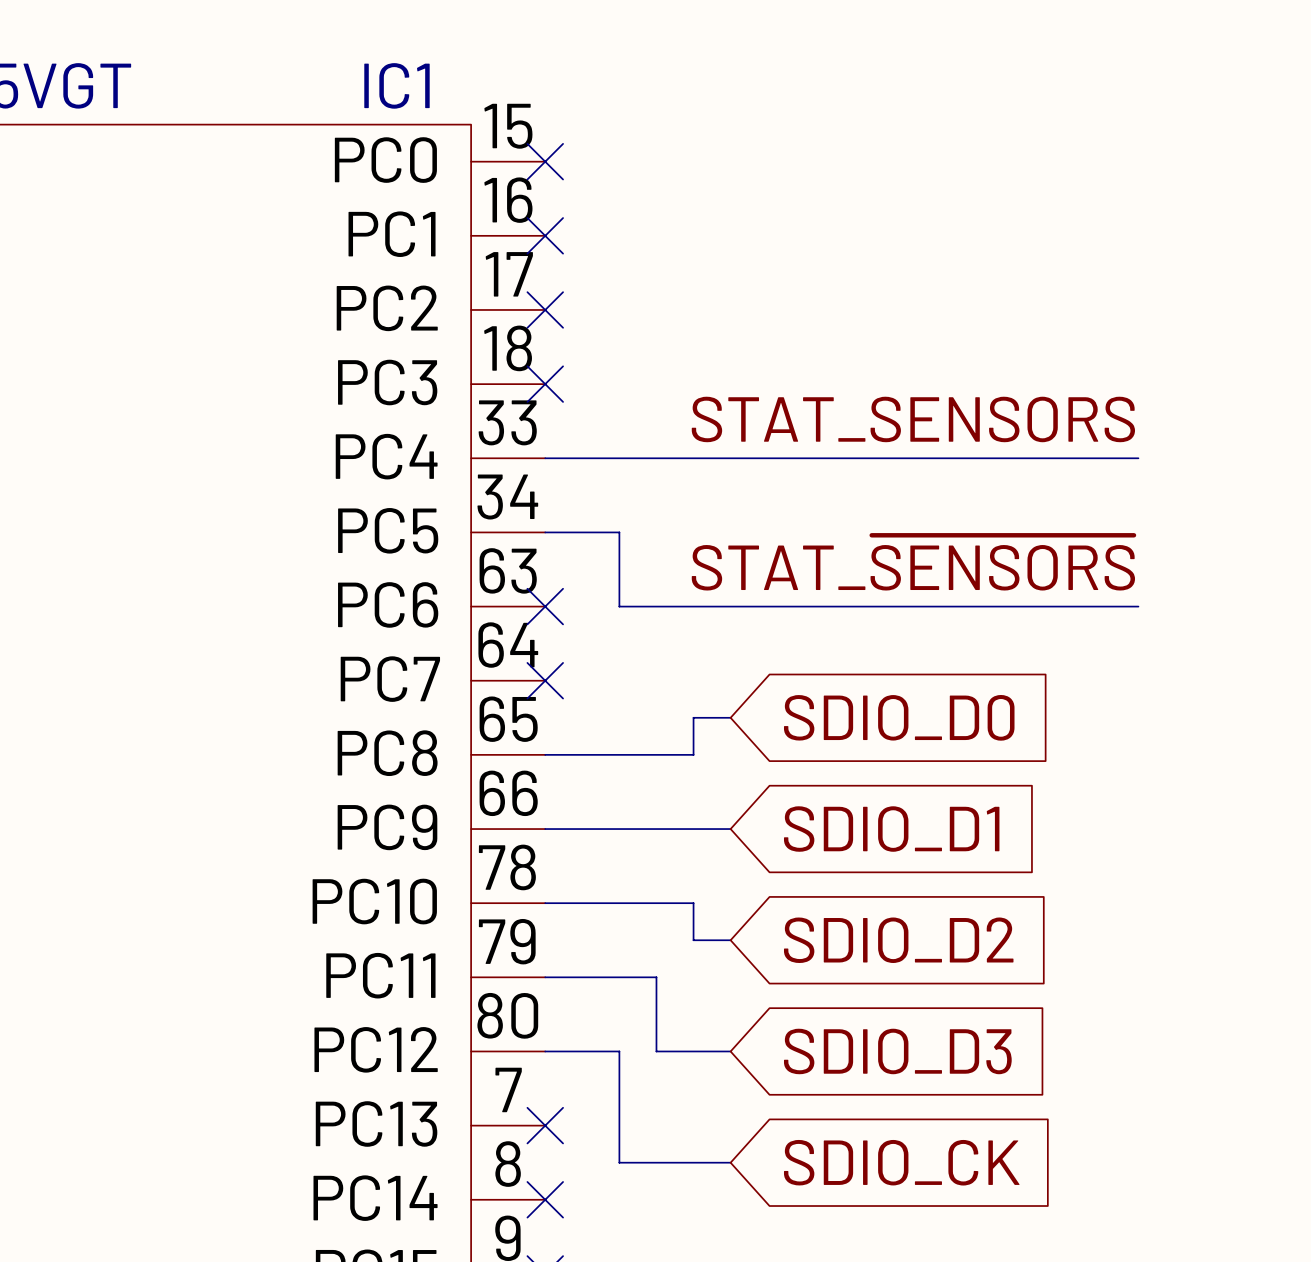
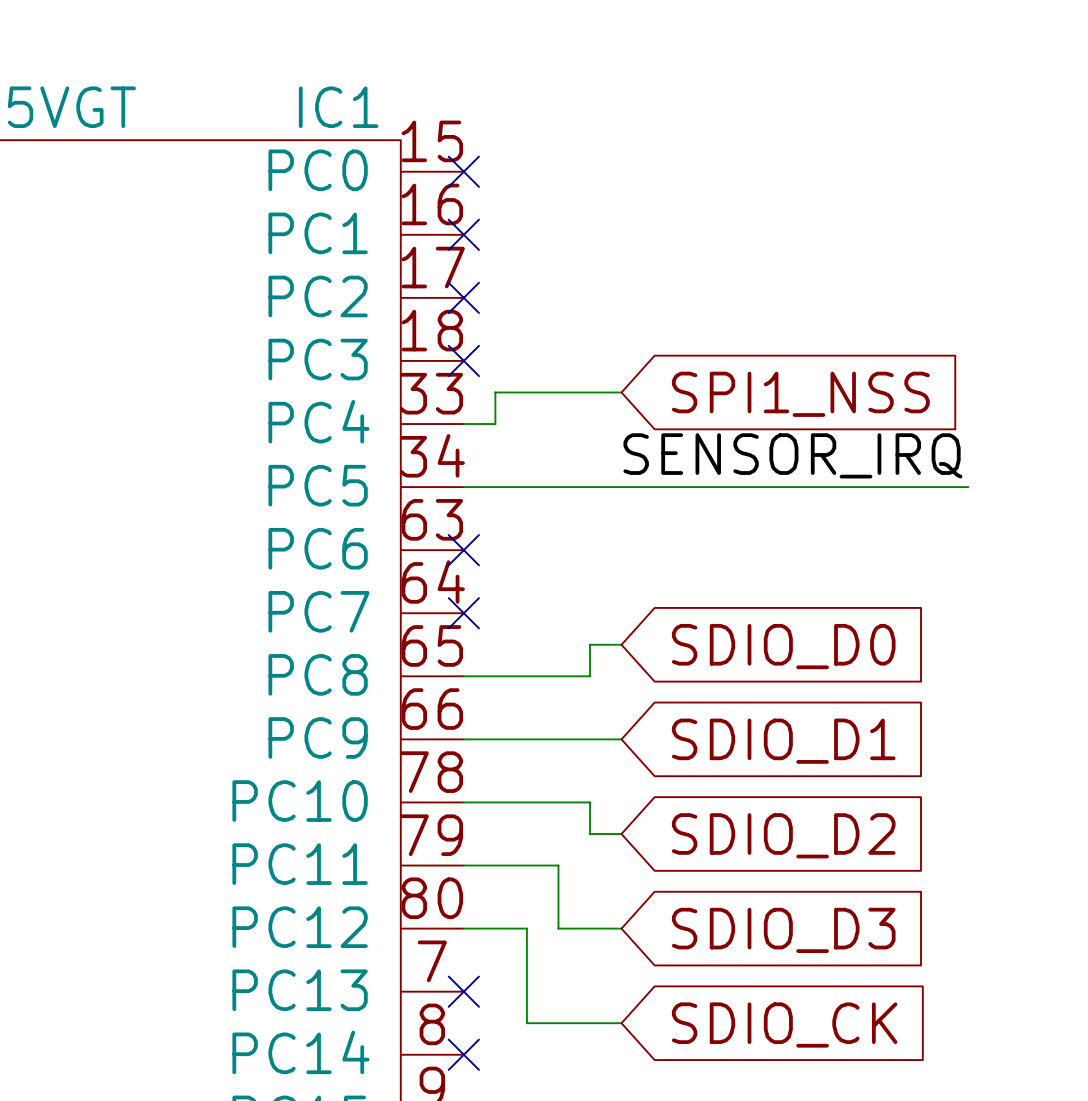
label: STAT_SENSORS (913, 419) -> none
global label: none -> SPI1_NSS (800, 394)
wire: (582, 458) (1138, 458) -> (495, 424) (495, 392) (621, 392)
label: none -> SENSOR_IRQ (792, 455)
wire: (619, 532) (619, 606) (1138, 606) -> (526, 487) (968, 487)
label: STAT_~{SENSORS} (913, 562) -> none

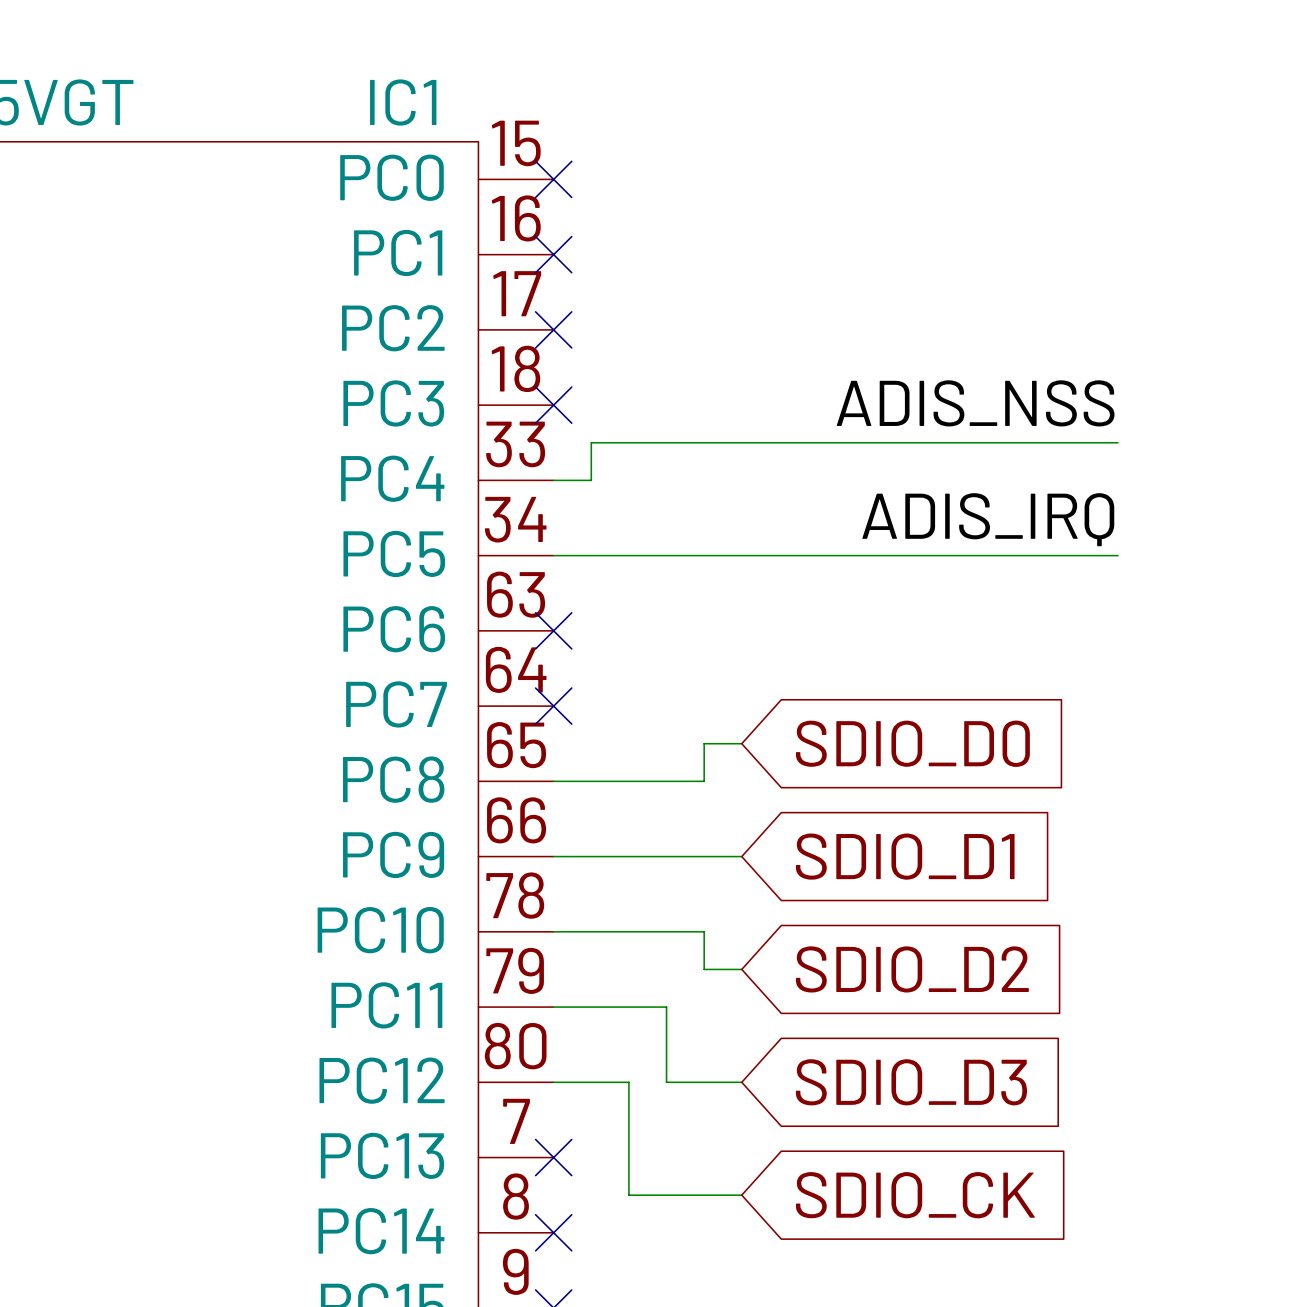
label: none -> ADIS_NSS (975, 403)
wire: none -> (741, 442) (1118, 442)
global label: SPI1_NSS (800, 394) -> none
label: SENSOR_IRQ (792, 455) -> none
label: none -> ADIS_IRQ (988, 519)
wire: (936, 487) (968, 487) -> none

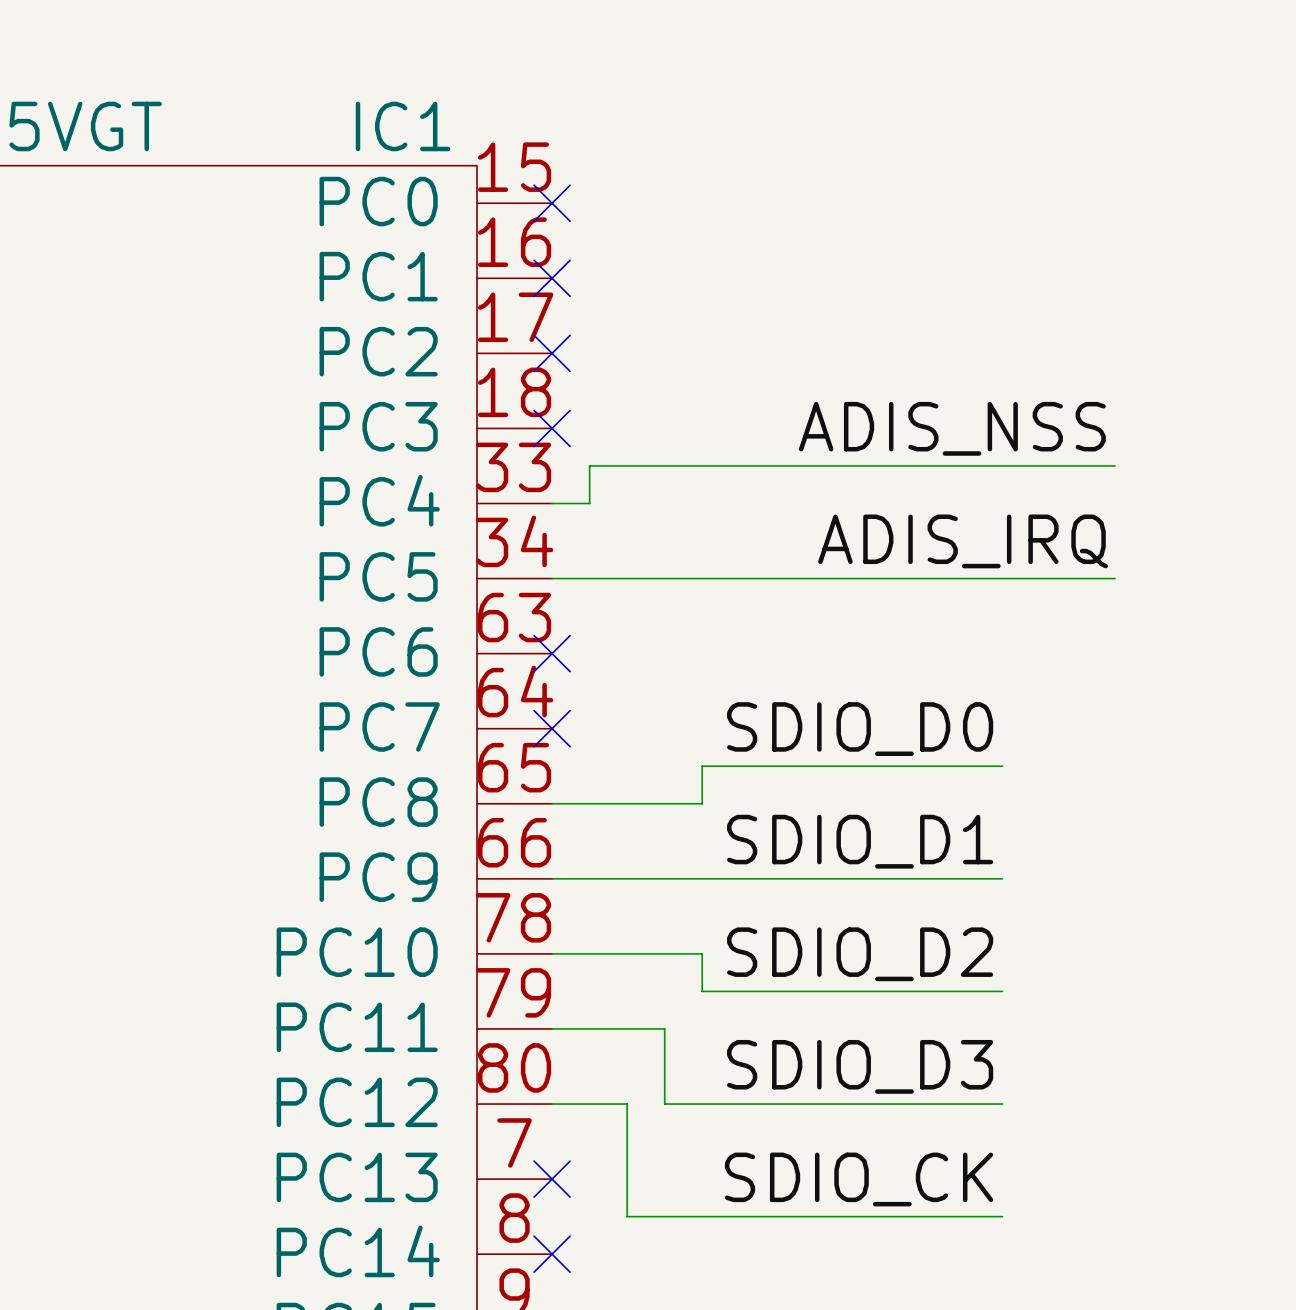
label: none -> SDIO_D0 (860, 729)
wire: none -> (739, 766) (1002, 766)
global label: SDIO_D0 (912, 743) -> none
label: none -> SDIO_D1 (860, 841)
wire: none -> (739, 878) (1002, 878)
global label: SDIO_D1 (905, 856) -> none
label: none -> SDIO_D2 (860, 954)
wire: none -> (739, 991) (1002, 991)
global label: SDIO_D2 (912, 969) -> none
label: none -> SDIO_D3 (860, 1066)
wire: none -> (739, 1104) (1002, 1104)
global label: SDIO_D3 (911, 1082) -> none
label: none -> SDIO_CK (859, 1179)
wire: none -> (739, 1216) (1002, 1216)
global label: SDIO_CK (915, 1195) -> none

